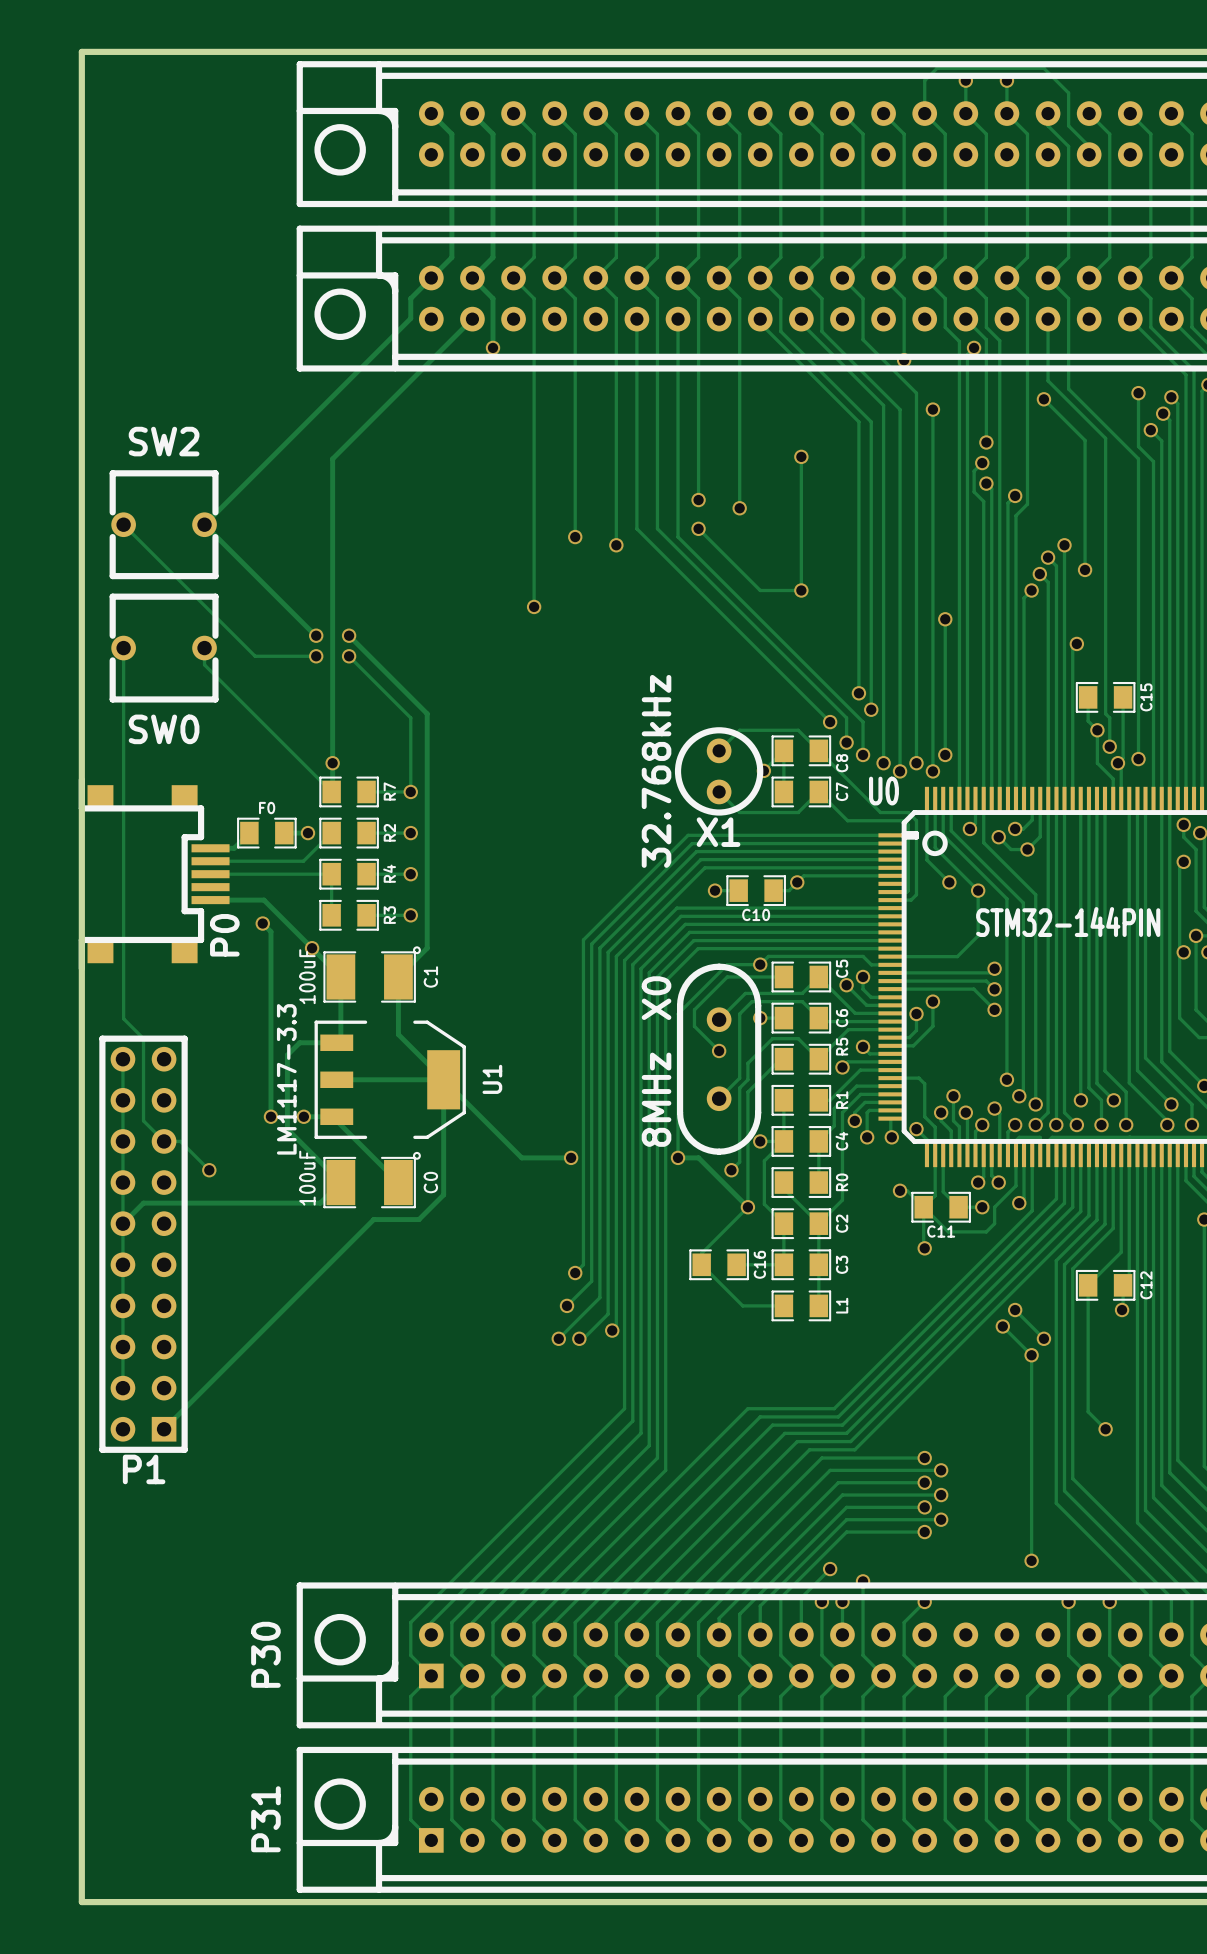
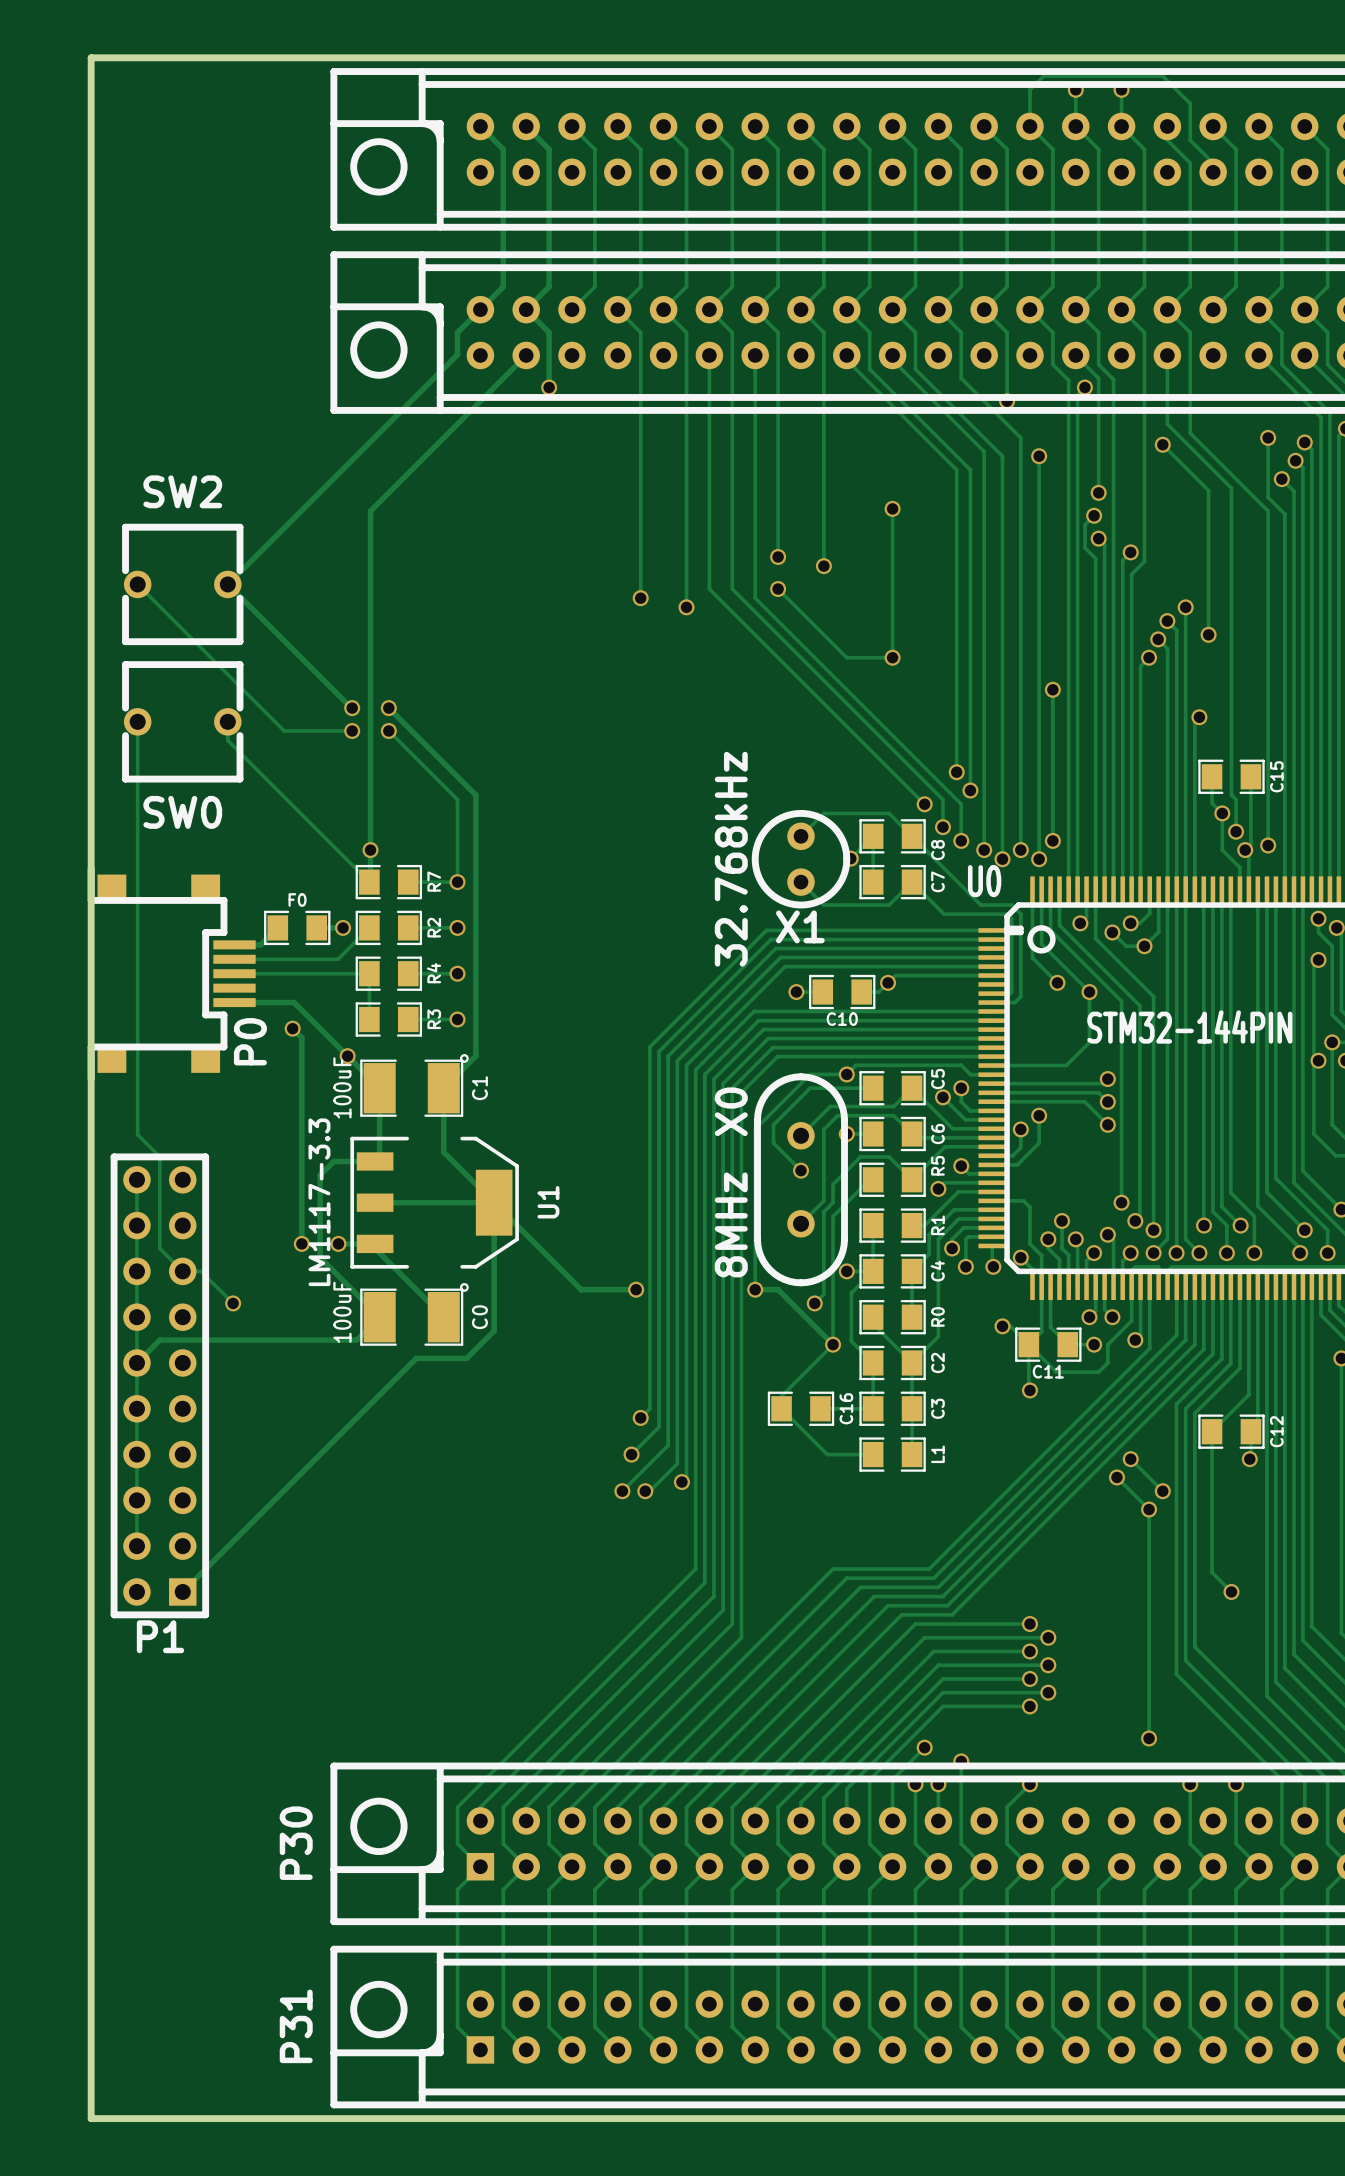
track: (513, 278) (534, 298) (534, 606) -> none
via: (534, 606) -> none

